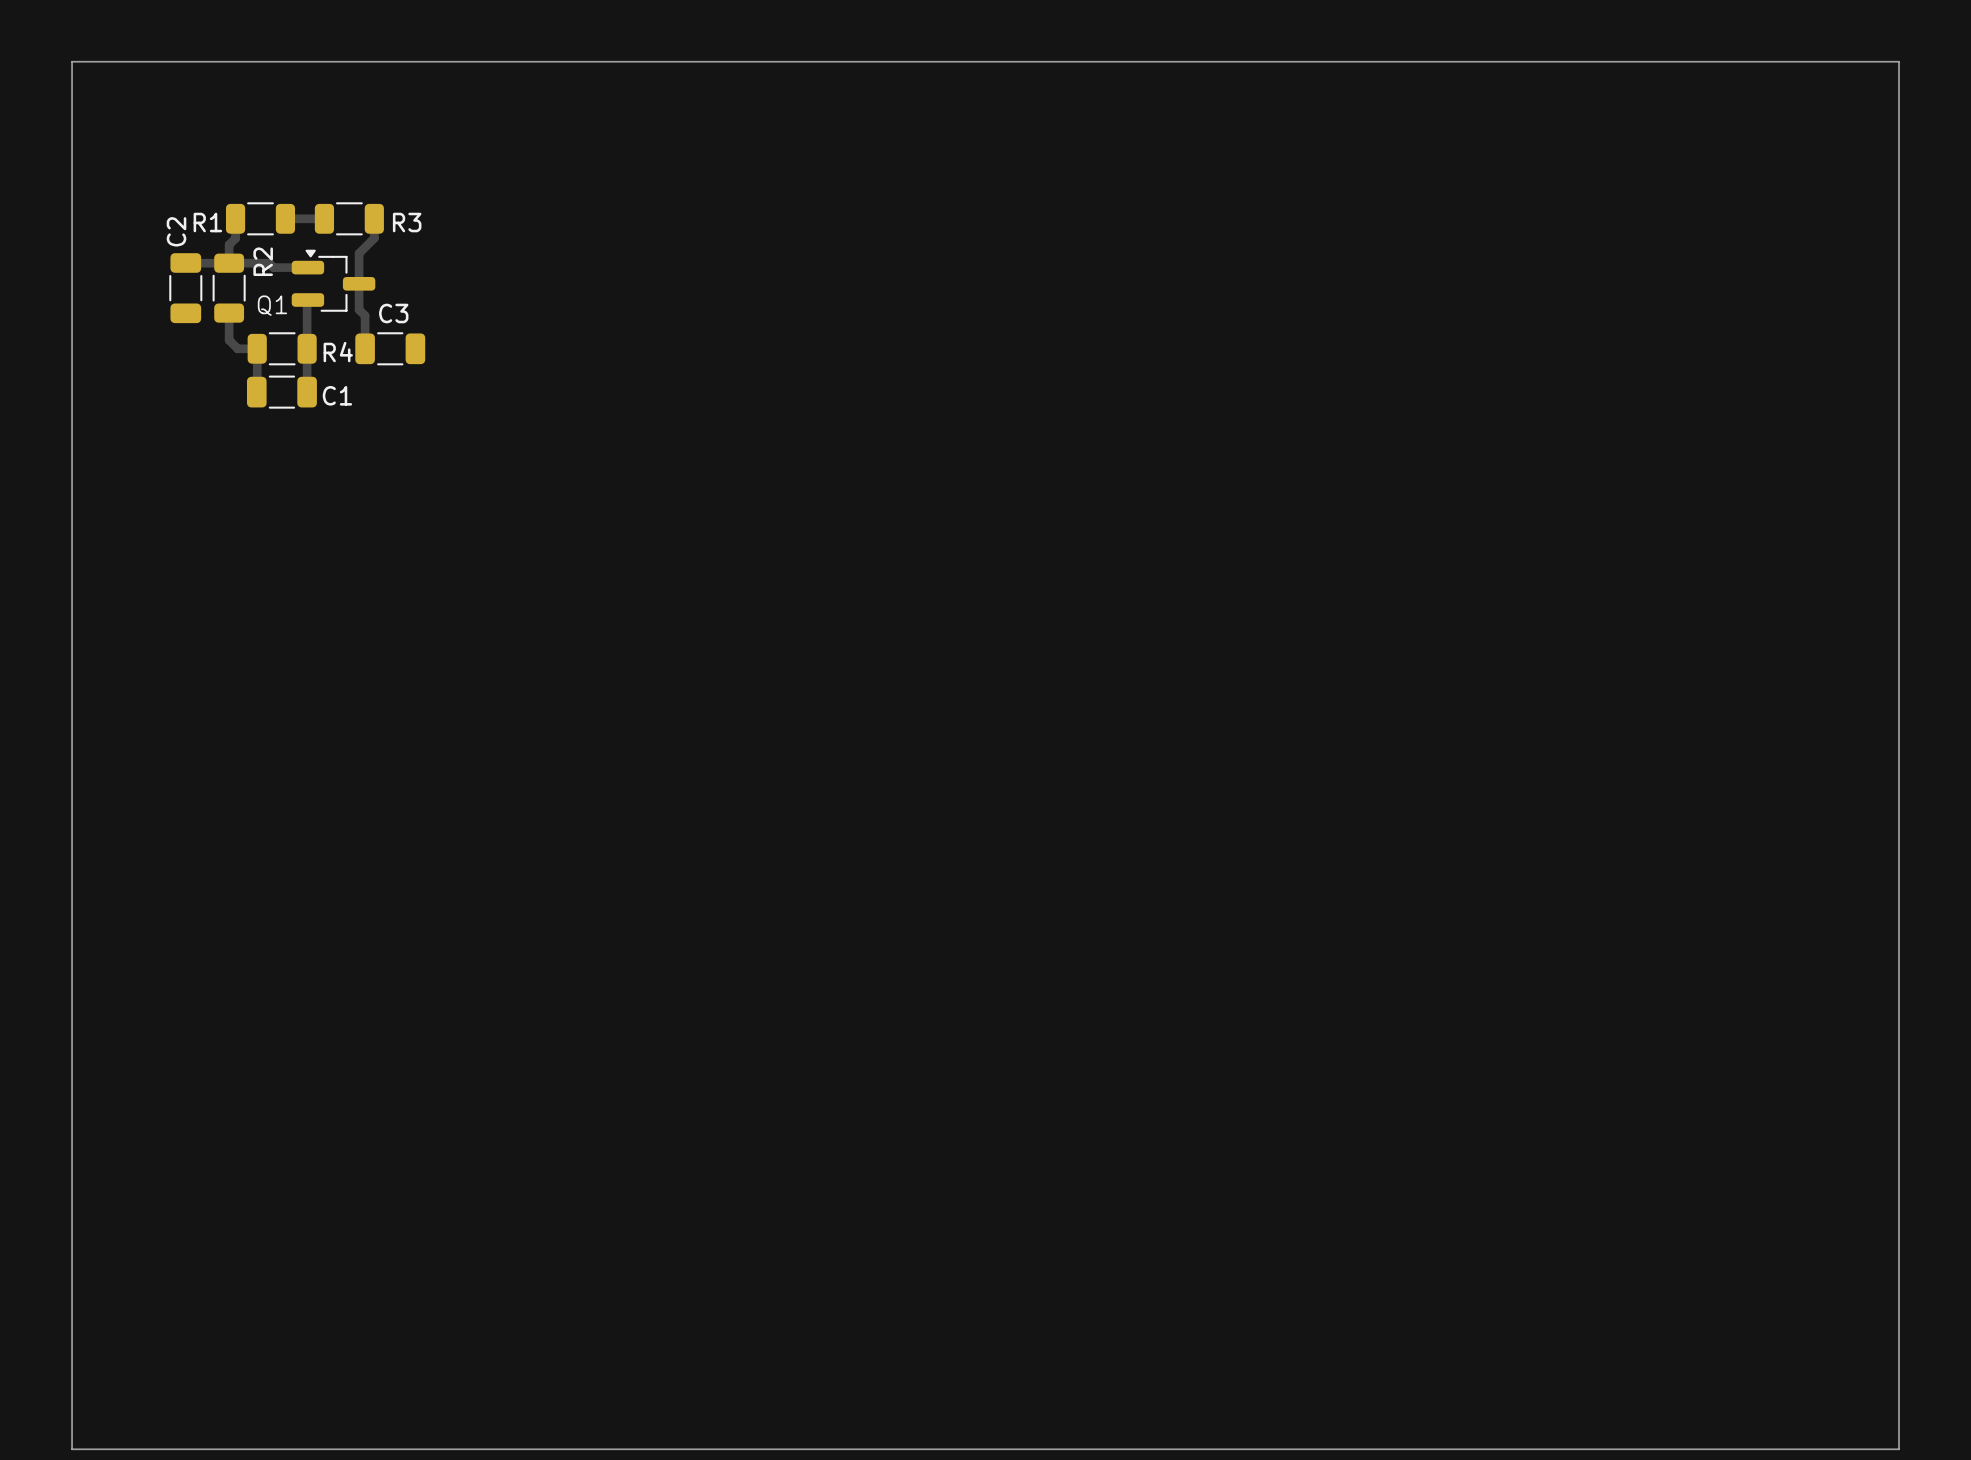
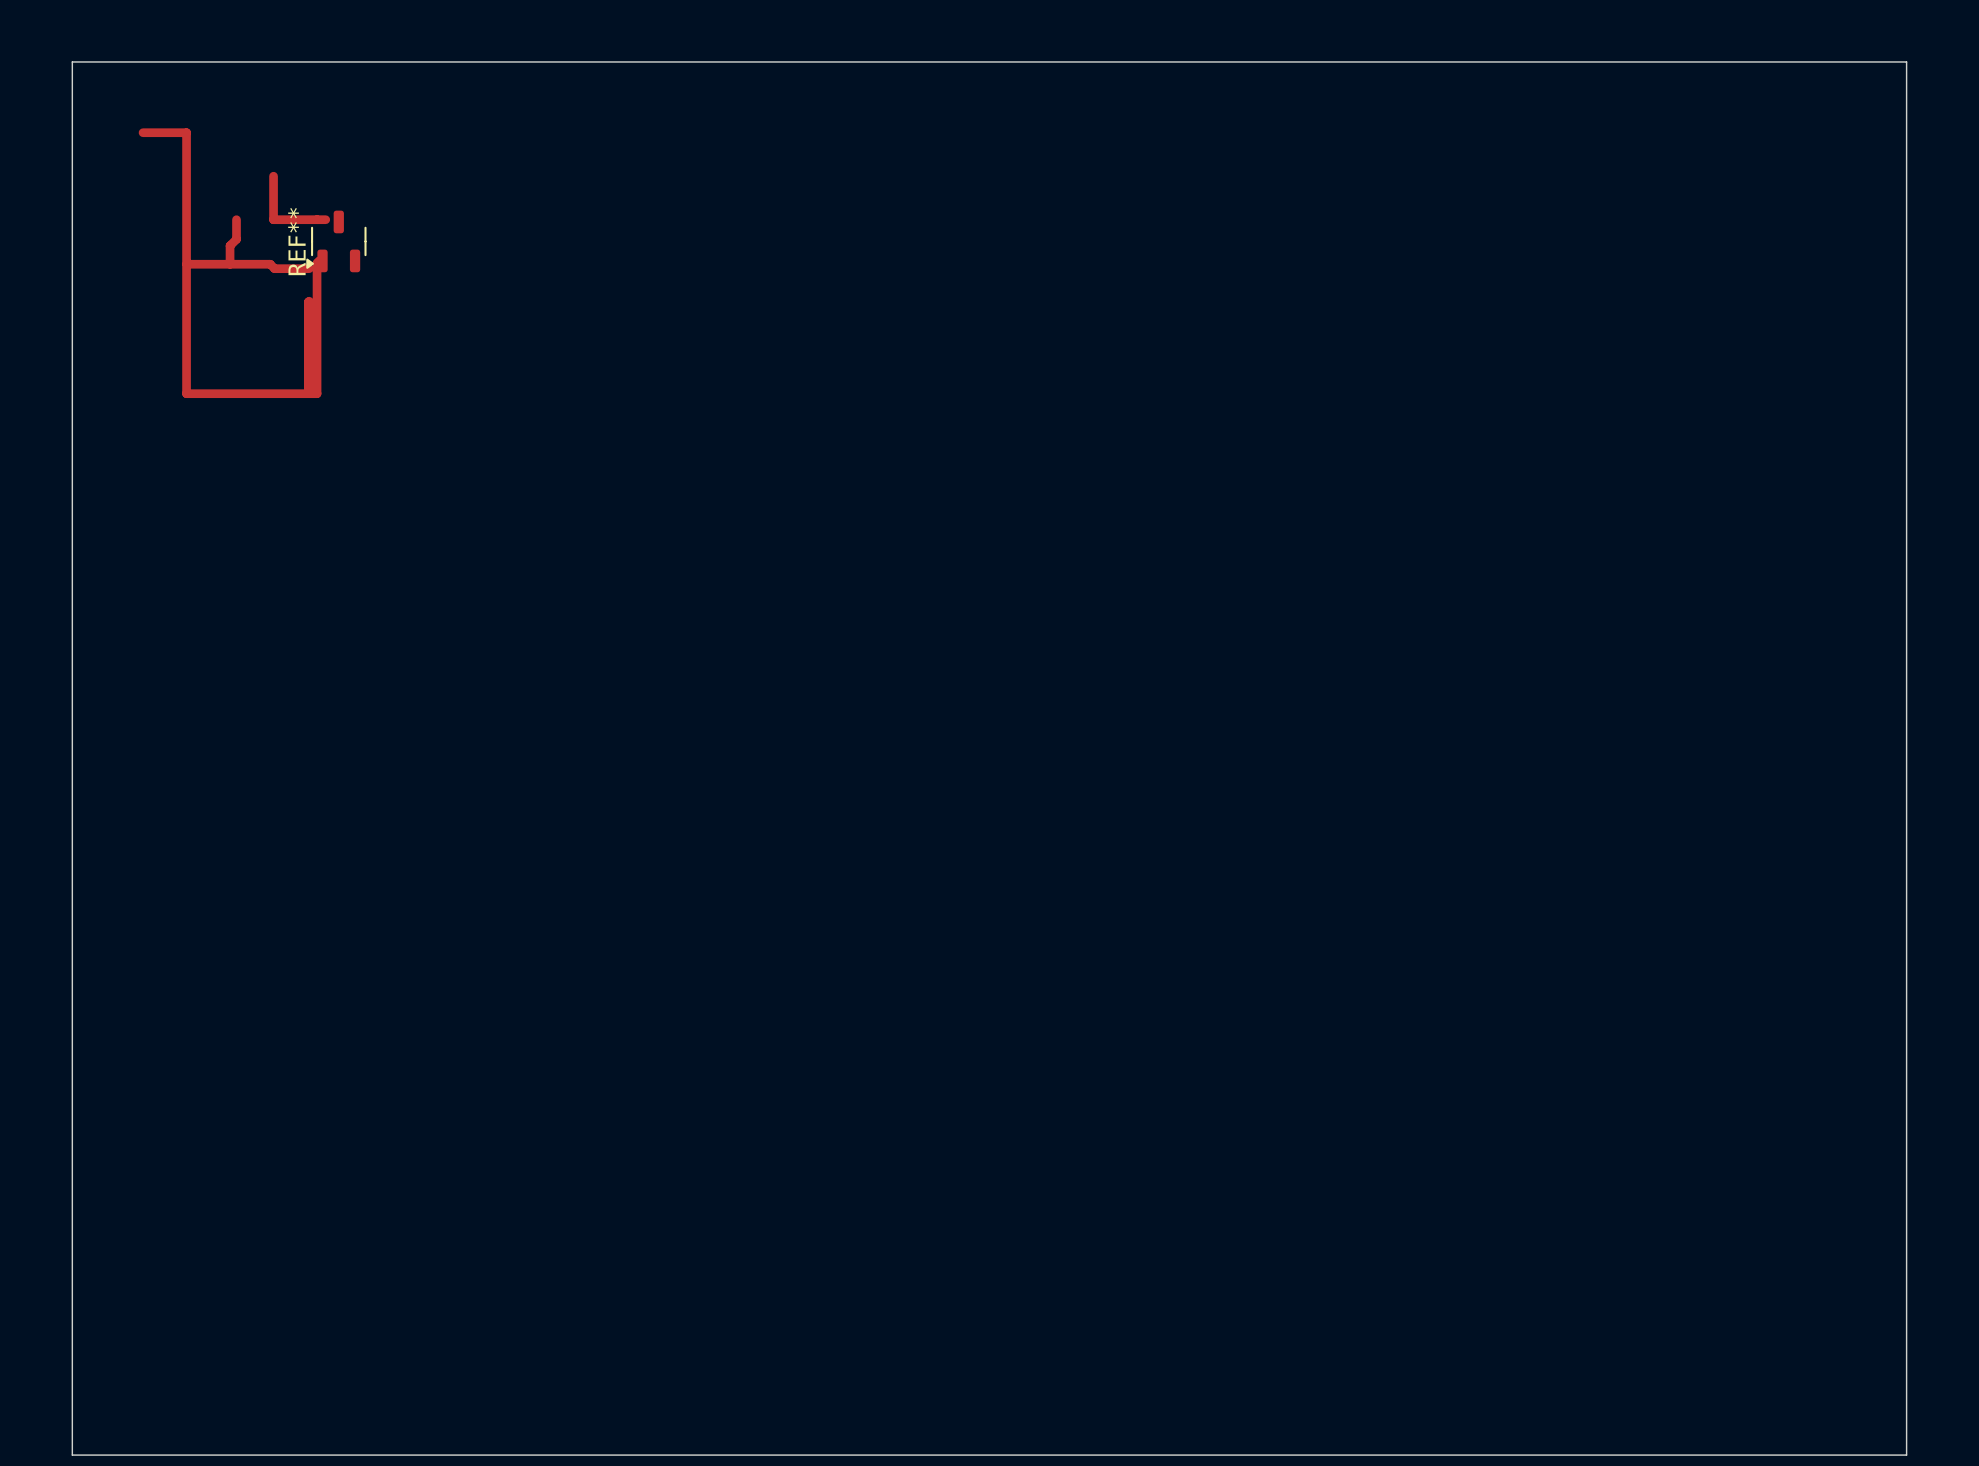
track: none -> (143, 132) (186, 132) (186, 393) (317, 393) (317, 263) (322, 260)
track: none -> (273, 176) (273, 219) (286, 219)
R1: (260, 218) -> none
R3: (349, 218) -> none
track: (374, 218) (374, 238) (359, 253) (359, 309) (365, 315) (365, 348) -> none
REF**: none -> (336, 241)
Q1: (333, 280) -> none
C2: (185, 288) -> none
R2: (229, 288) -> none
track: (229, 313) (229, 340) (237, 348) (257, 348) (256, 392) -> none
R4: (282, 348) -> none
C3: (390, 348) -> none
C1: (281, 392) -> none

